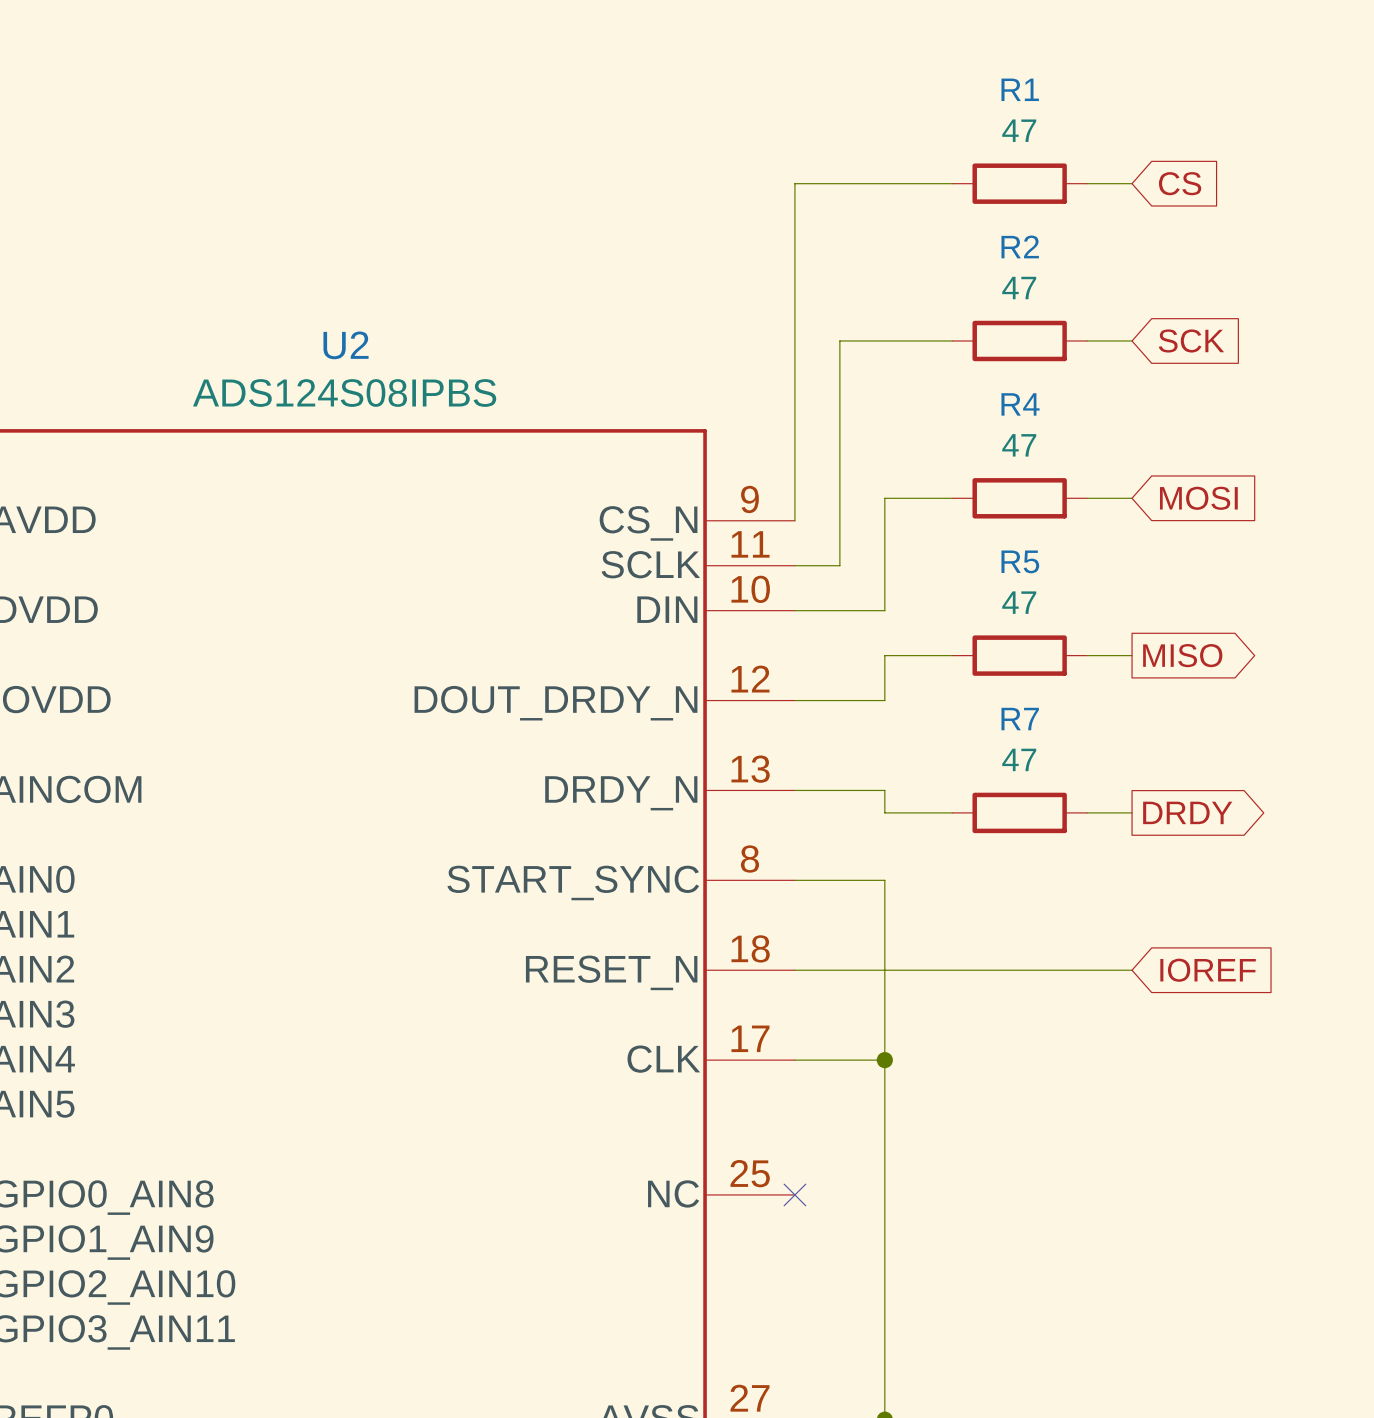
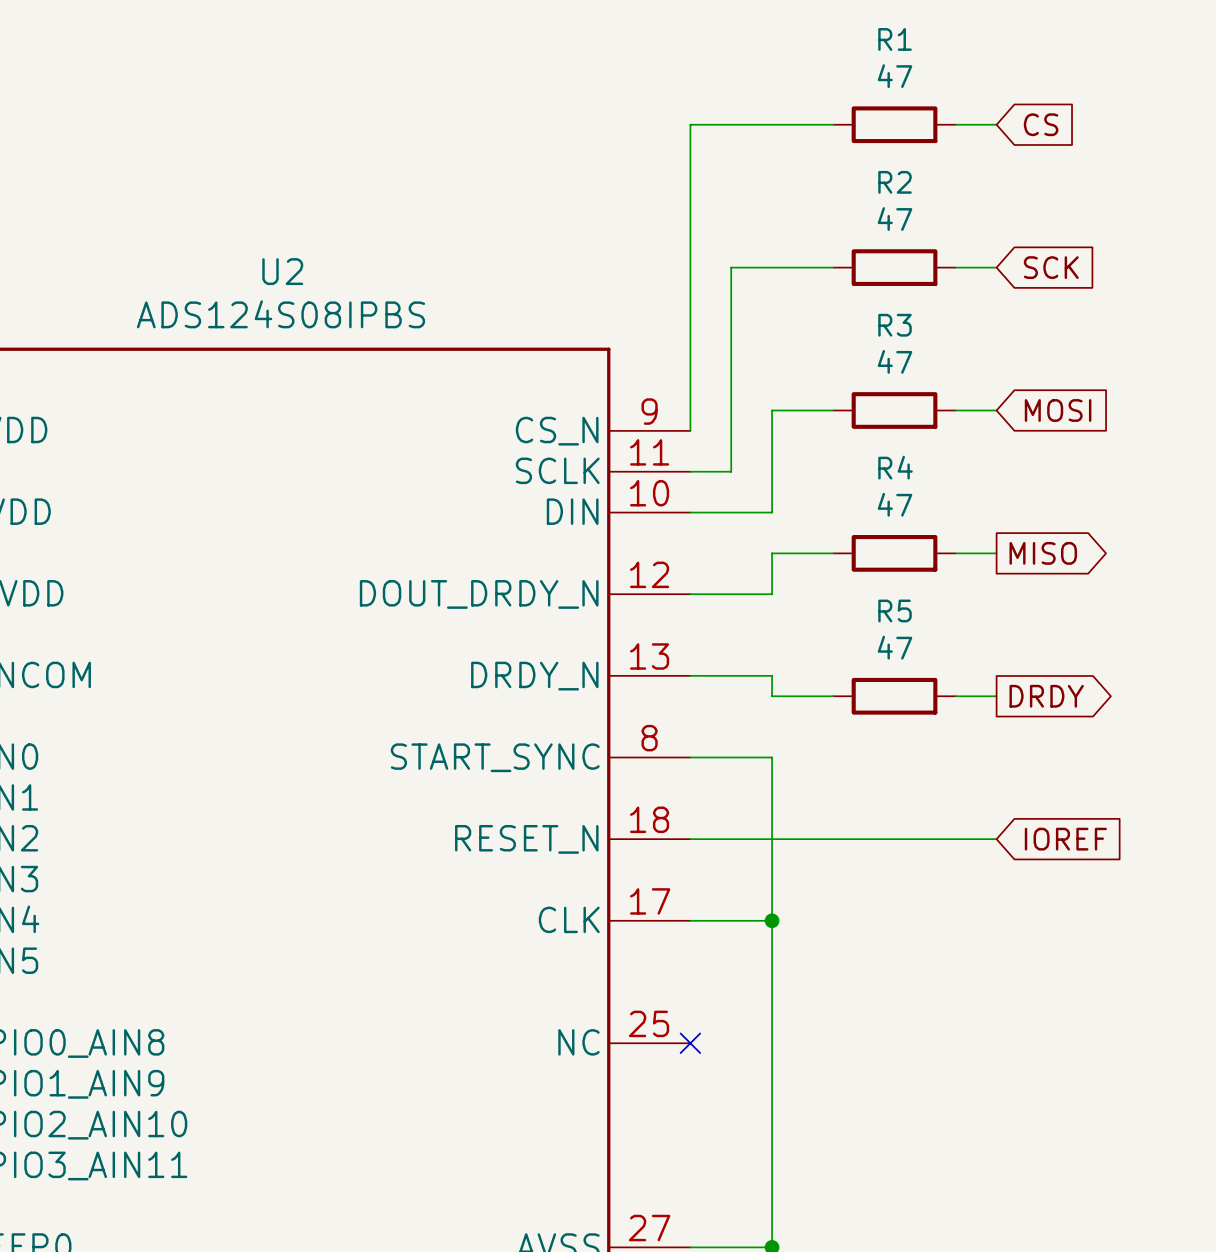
R4 name: R4 (1020, 404) -> R3 (895, 325)
R5 name: R5 (1020, 561) -> R4 (895, 467)
R7 name: R7 (1020, 719) -> R5 (895, 610)

